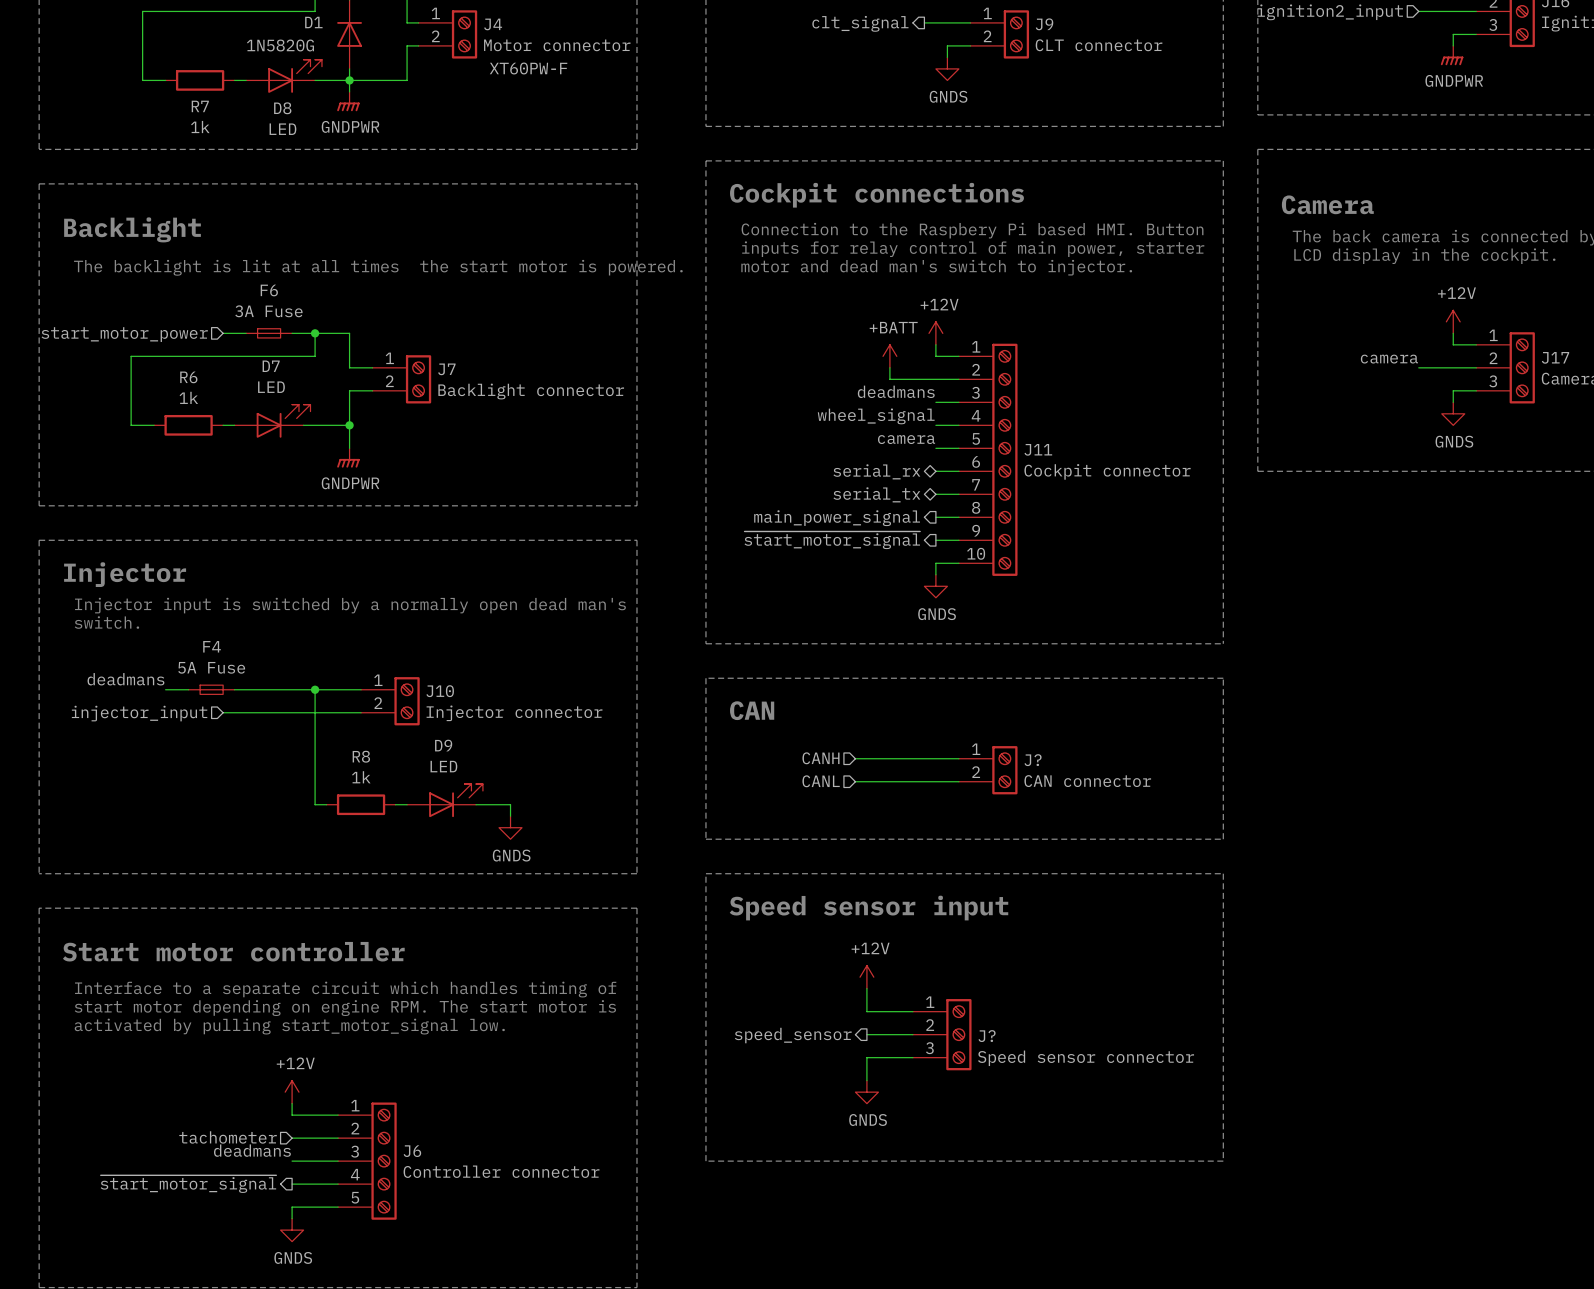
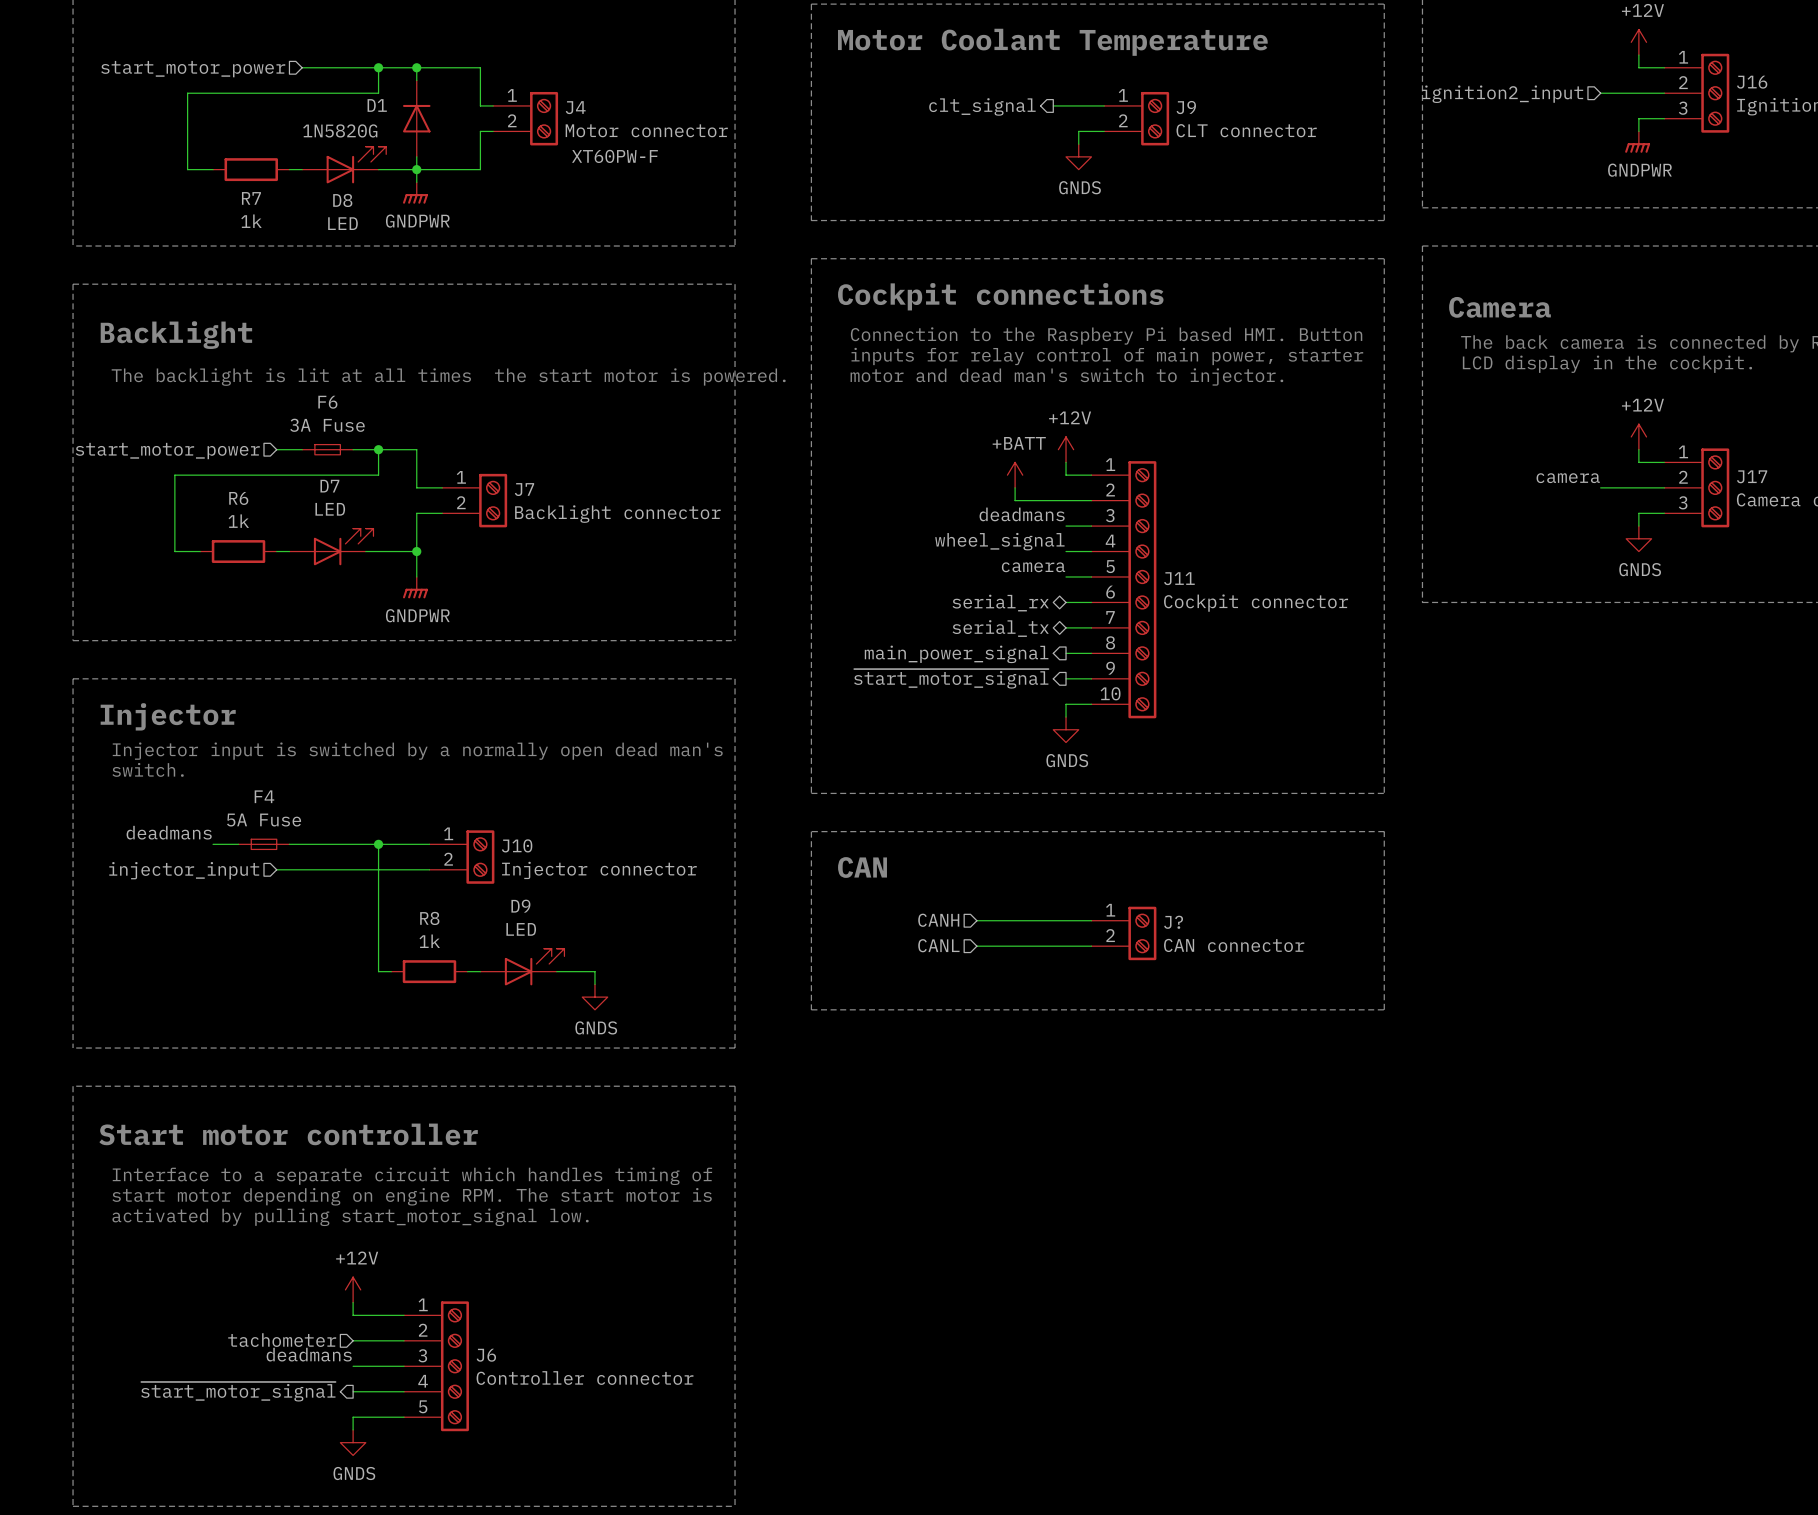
line: (705, 873) (1223, 873) (1223, 1161) (705, 1161) (705, 873) -> none
text: Speed sensor input (869, 908) -> none
power symbol: +12V (866, 977) -> none
wire: (866, 988) (866, 1011) (912, 1011) -> none
wire: (866, 1034) (912, 1034) -> none
J?: Speed sensor connector (942, 1034) -> none
hierarchical label: speed_sensor (793, 1035) -> none
wire: (912, 1057) (866, 1057) (866, 1080) -> none
power symbol: GNDS (866, 1092) -> none

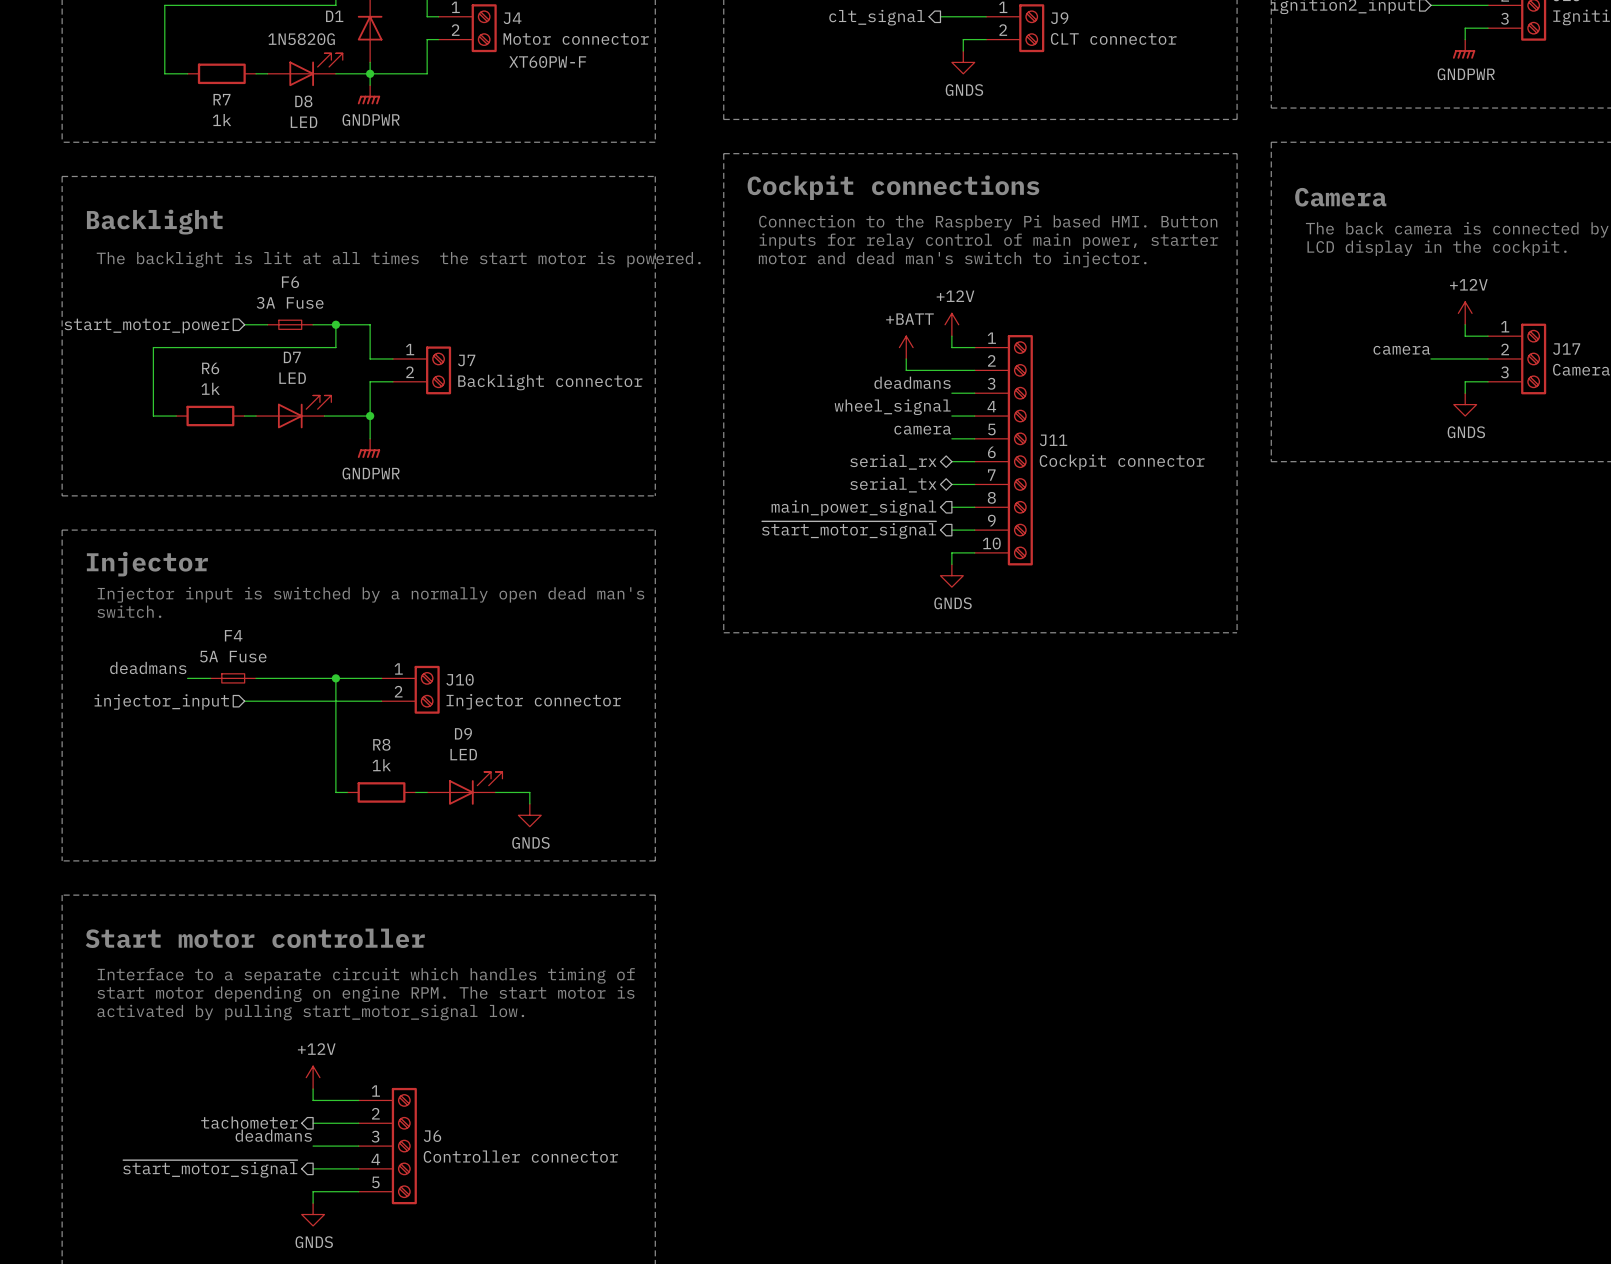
line: (811, 831) (811, 1009) (1384, 1009) (1384, 831) (811, 831) -> none
text: CAN (862, 867) -> none
hierarchical label: CANH (938, 920) -> none
wire: (976, 920) (1091, 920) -> none
J?: CAN connector (1123, 933) -> none
hierarchical label: CANL (938, 945) -> none
wire: (976, 946) (1091, 946) -> none
hierarchical label shape: input (282, 1340) -> output (249, 1122)

